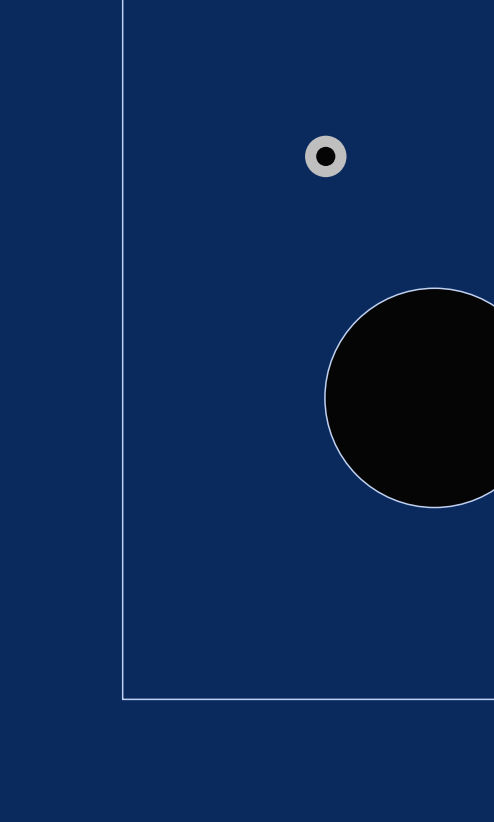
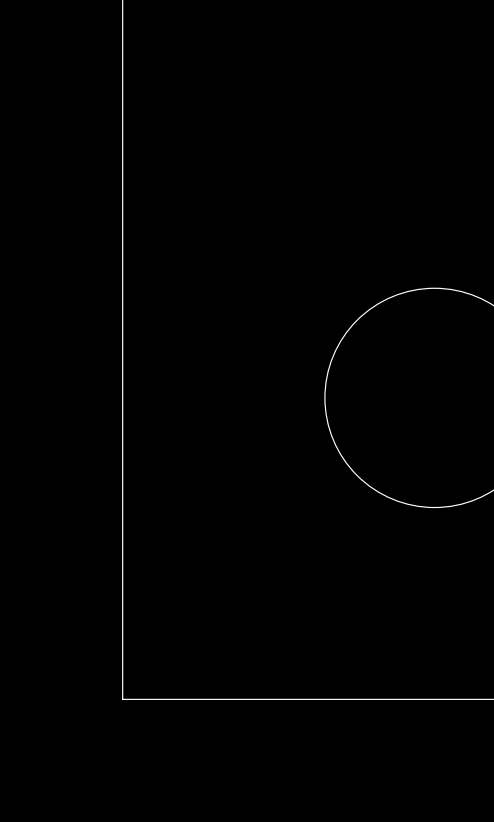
via: (325, 156) -> none

